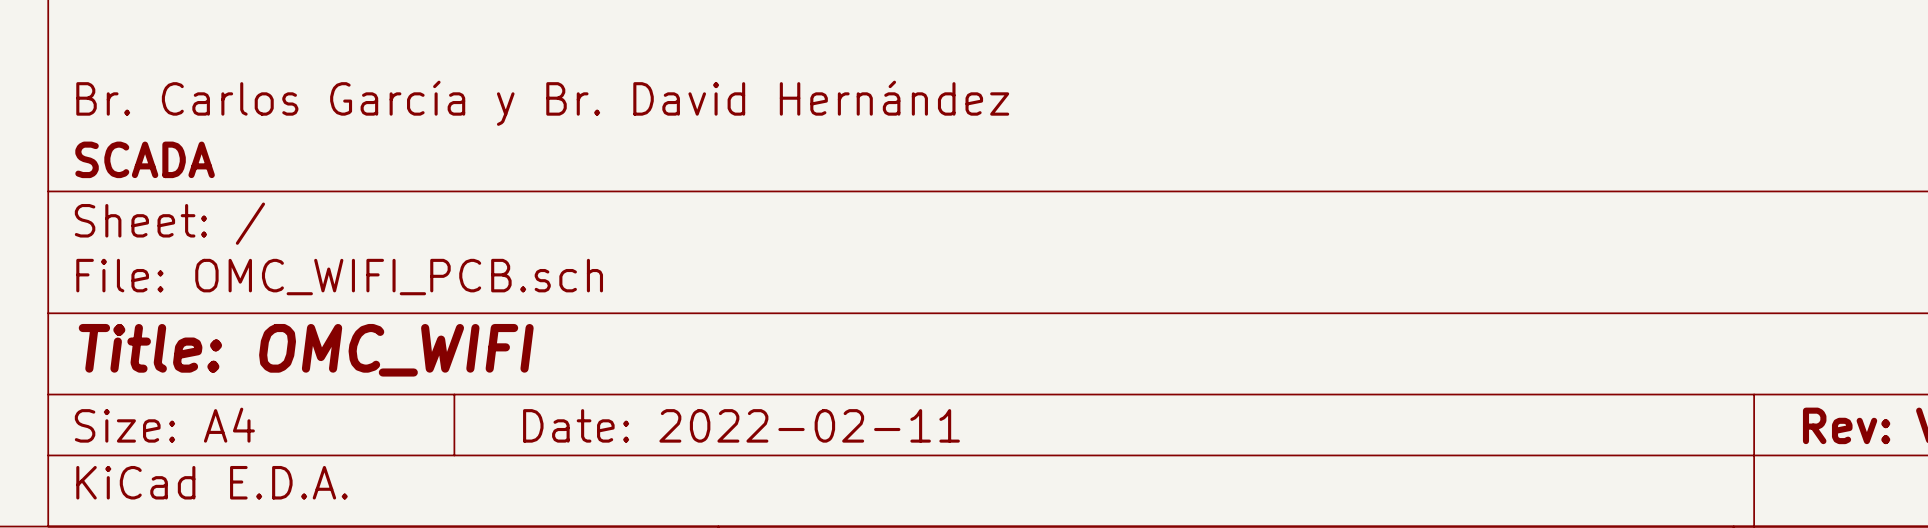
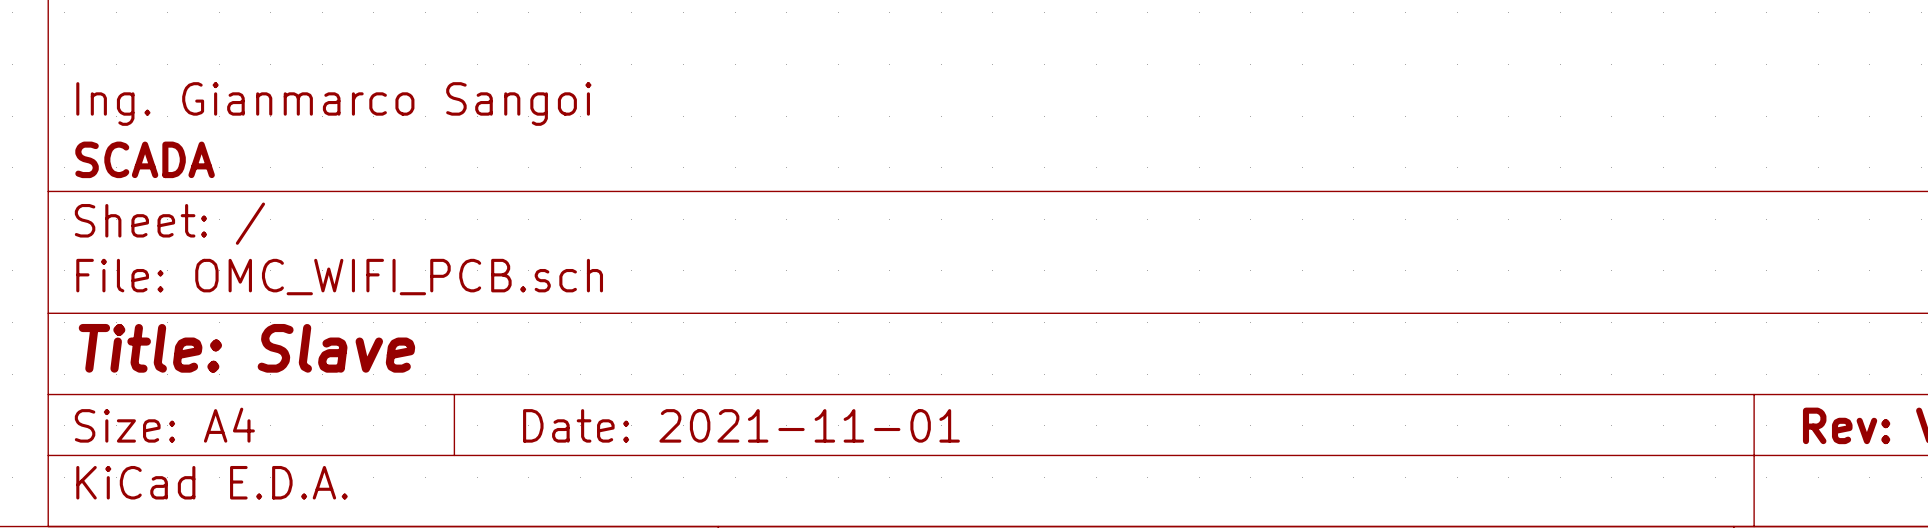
title block: Br. Carlos García y Br. David Hernández (542, 103) -> Ing. Gianmarco Sangoi (333, 103)
title block: Title: OMC_WIFI (306, 350) -> Title: Slave (246, 348)
title block: Date: 2022-02-11 (741, 425) -> Date: 2021-11-01 (741, 425)

